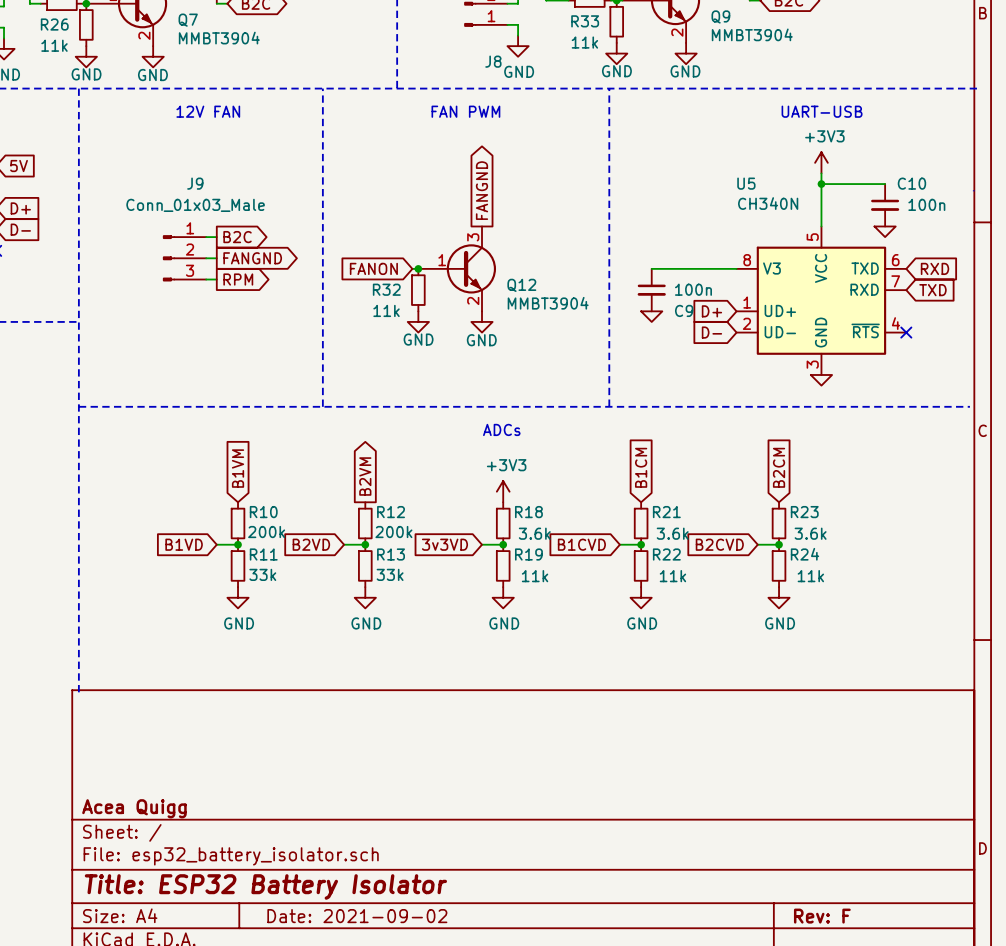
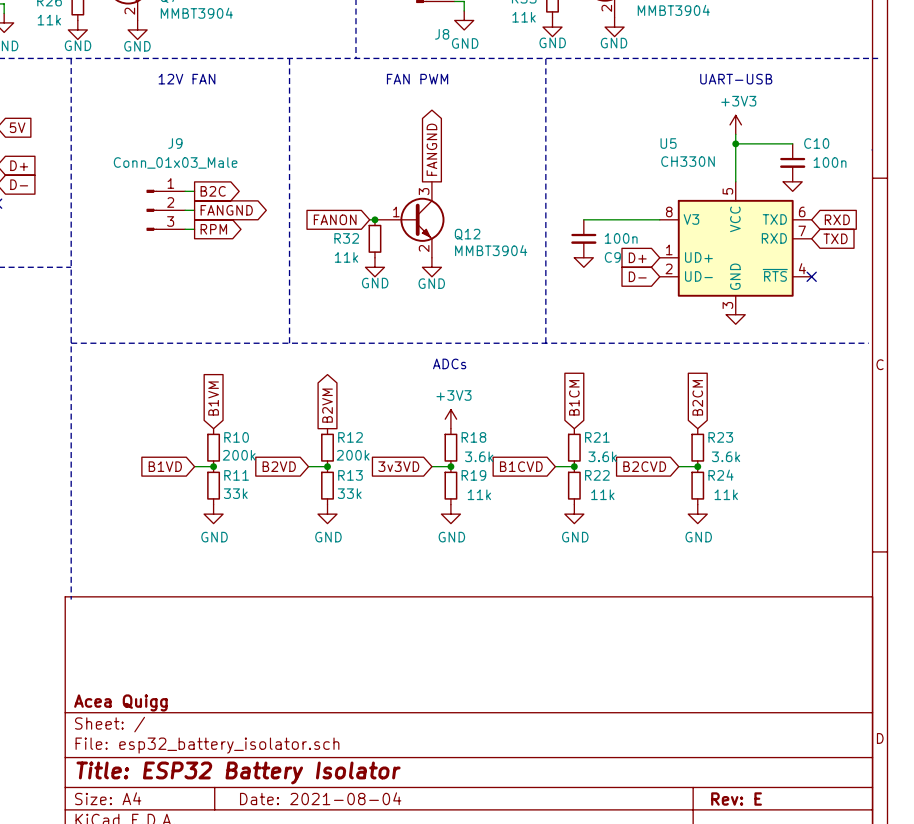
U5 value: CH340N (768, 203) -> CH330N (688, 161)
title block: Date: 2021-09-02 (357, 916) -> Date: 2021-08-04 (320, 798)
title block: Rev: F (822, 916) -> Rev: E (736, 799)

